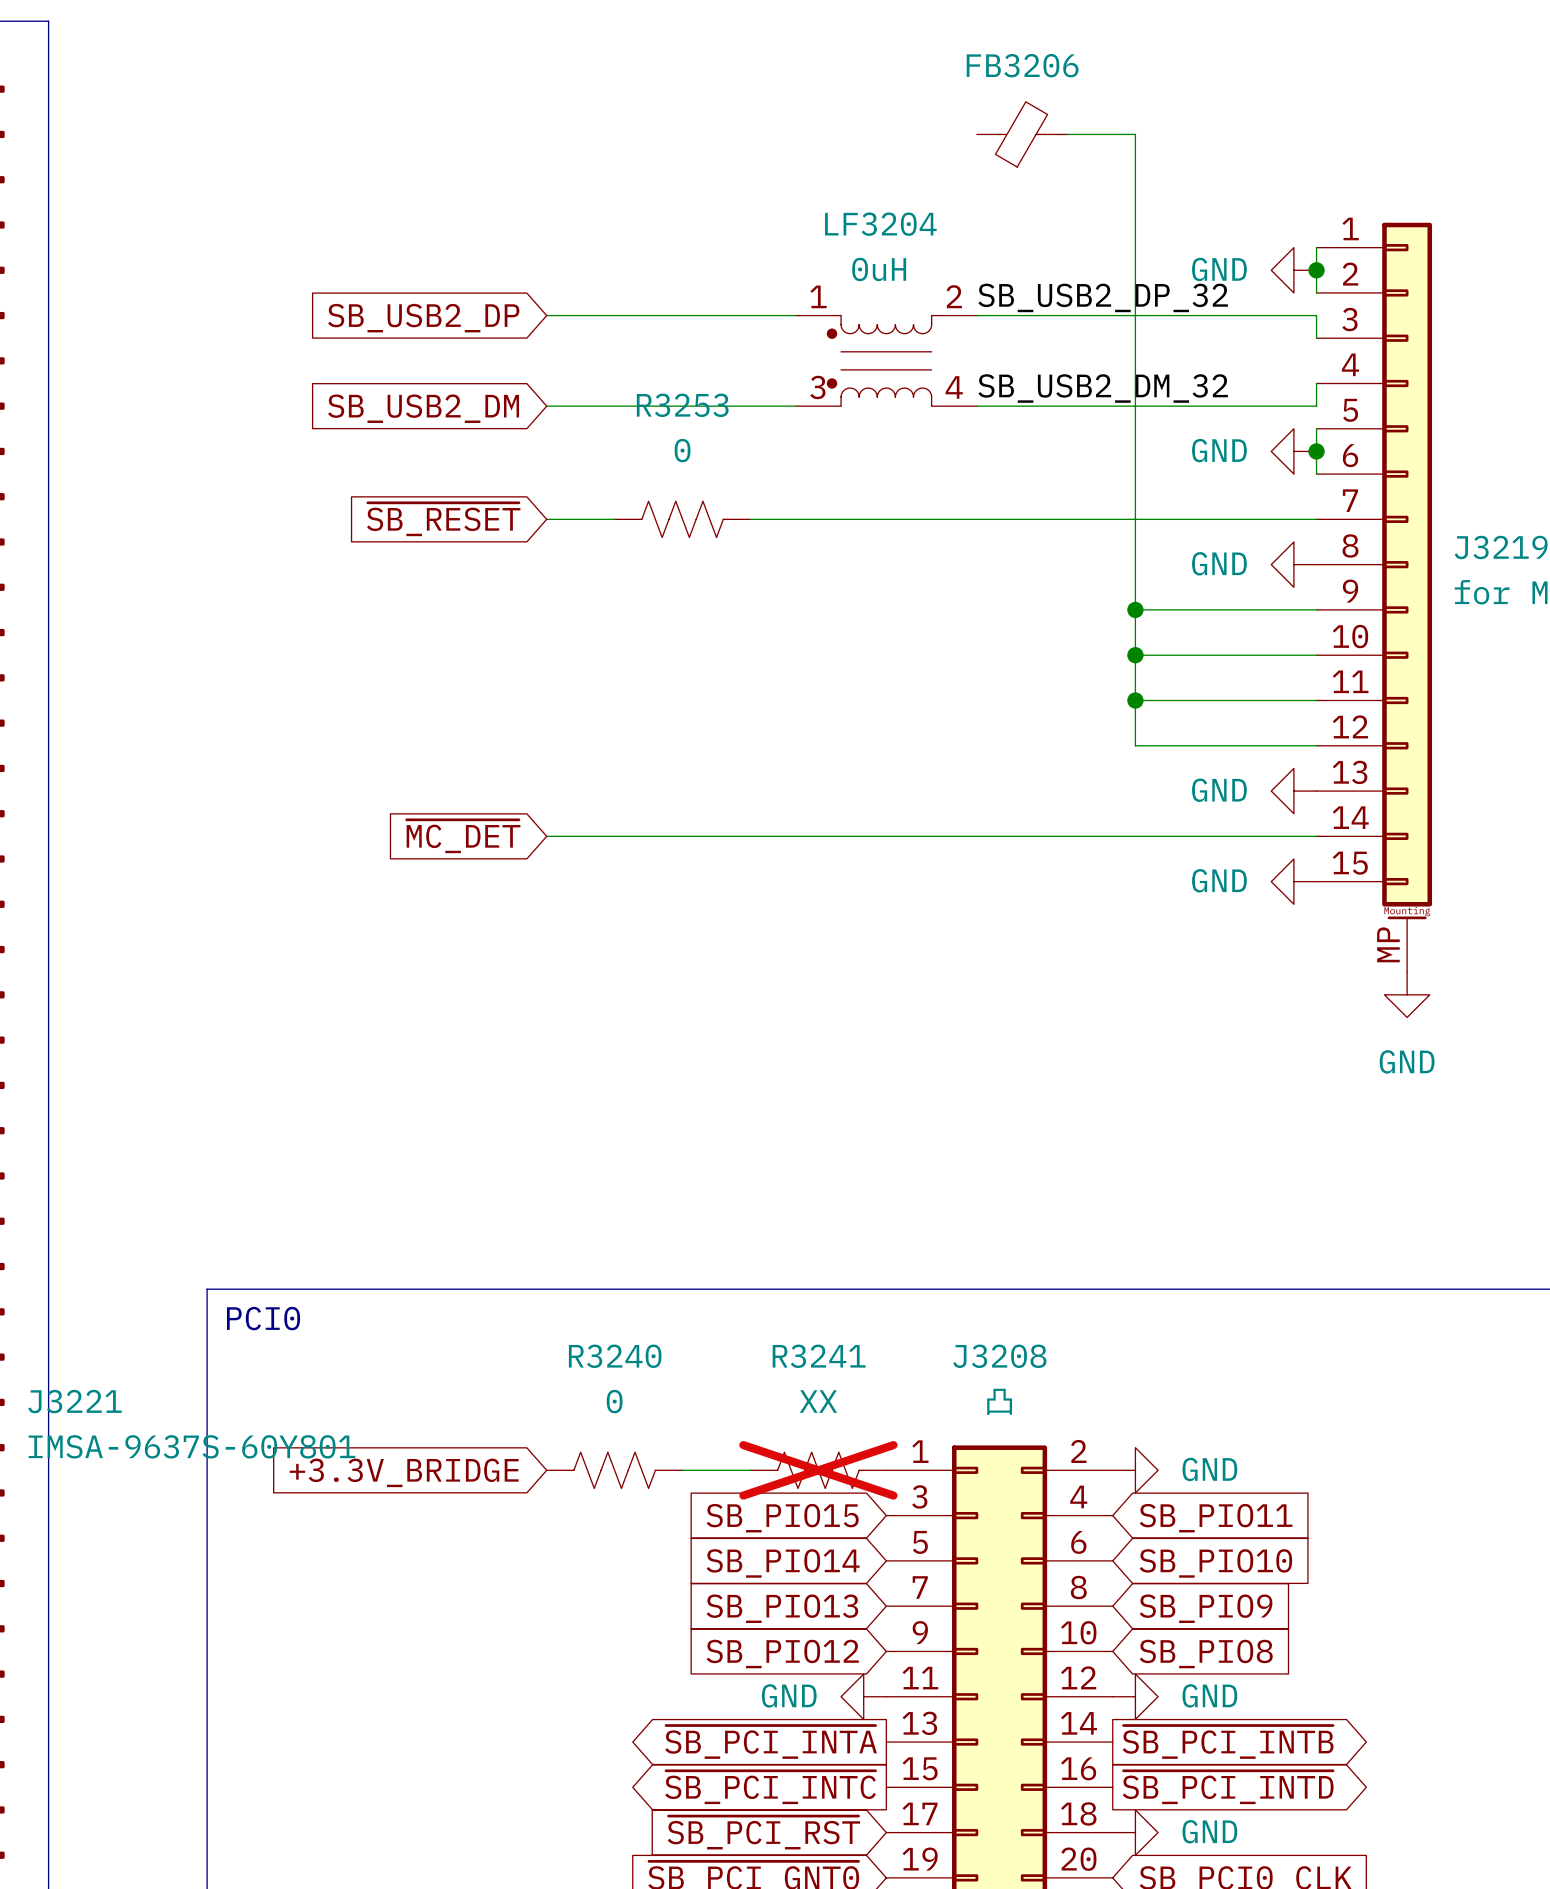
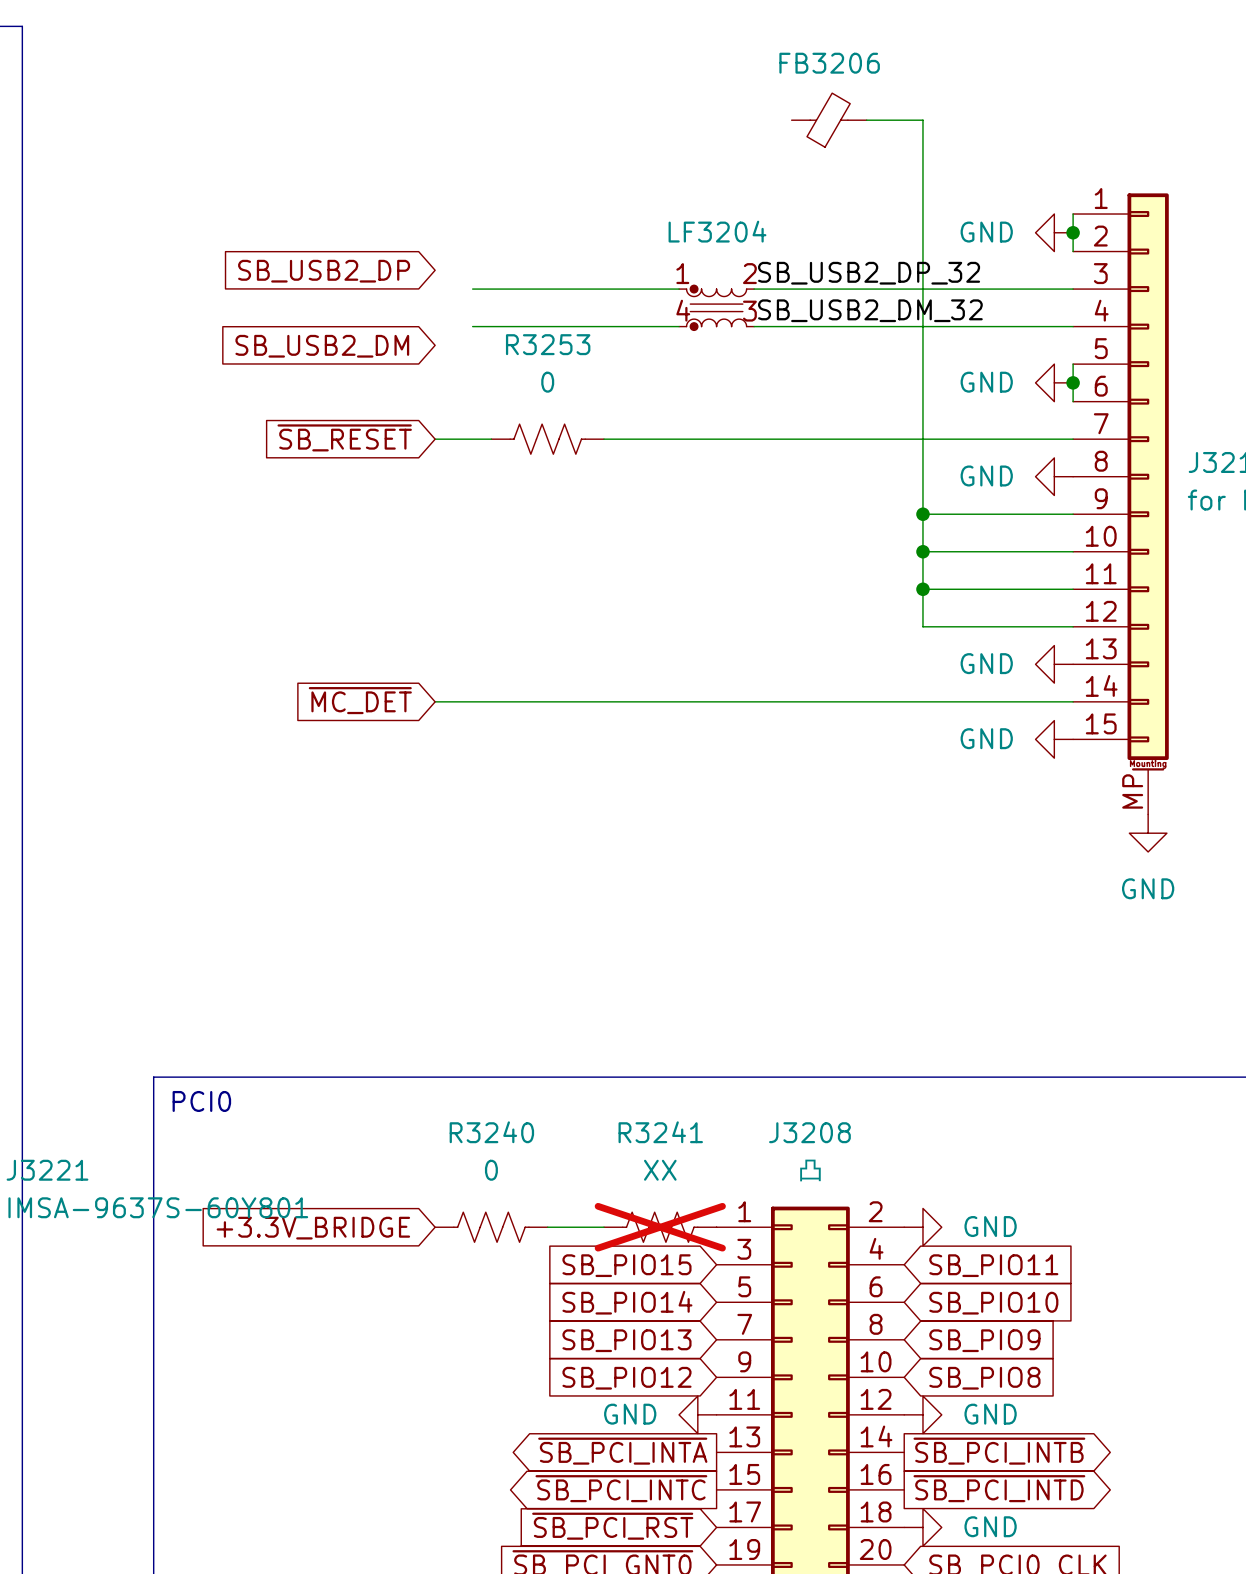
LF3204 name position: LF3204 (880, 224) -> LF3204 (717, 231)
LF3204 value: 0uH (879, 269) -> none
label position: SB_USB2_DP_32 (1103, 297) -> SB_USB2_DP_32 (869, 273)
wire: (546, 315) (795, 315) -> (472, 289) (679, 289)
LF3204 symbol: [795, 315, 977, 407] -> [679, 285, 755, 331]
wire: (976, 315) (1316, 315) (1316, 338) -> (754, 289) (1073, 289)
wire: (1316, 383) (1316, 406) (976, 406) -> (1073, 326) (754, 326)
label position: SB_USB2_DM_32 (1103, 388) -> SB_USB2_DM_32 (870, 310)
wire: (546, 406) (795, 406) -> (472, 326) (679, 326)

